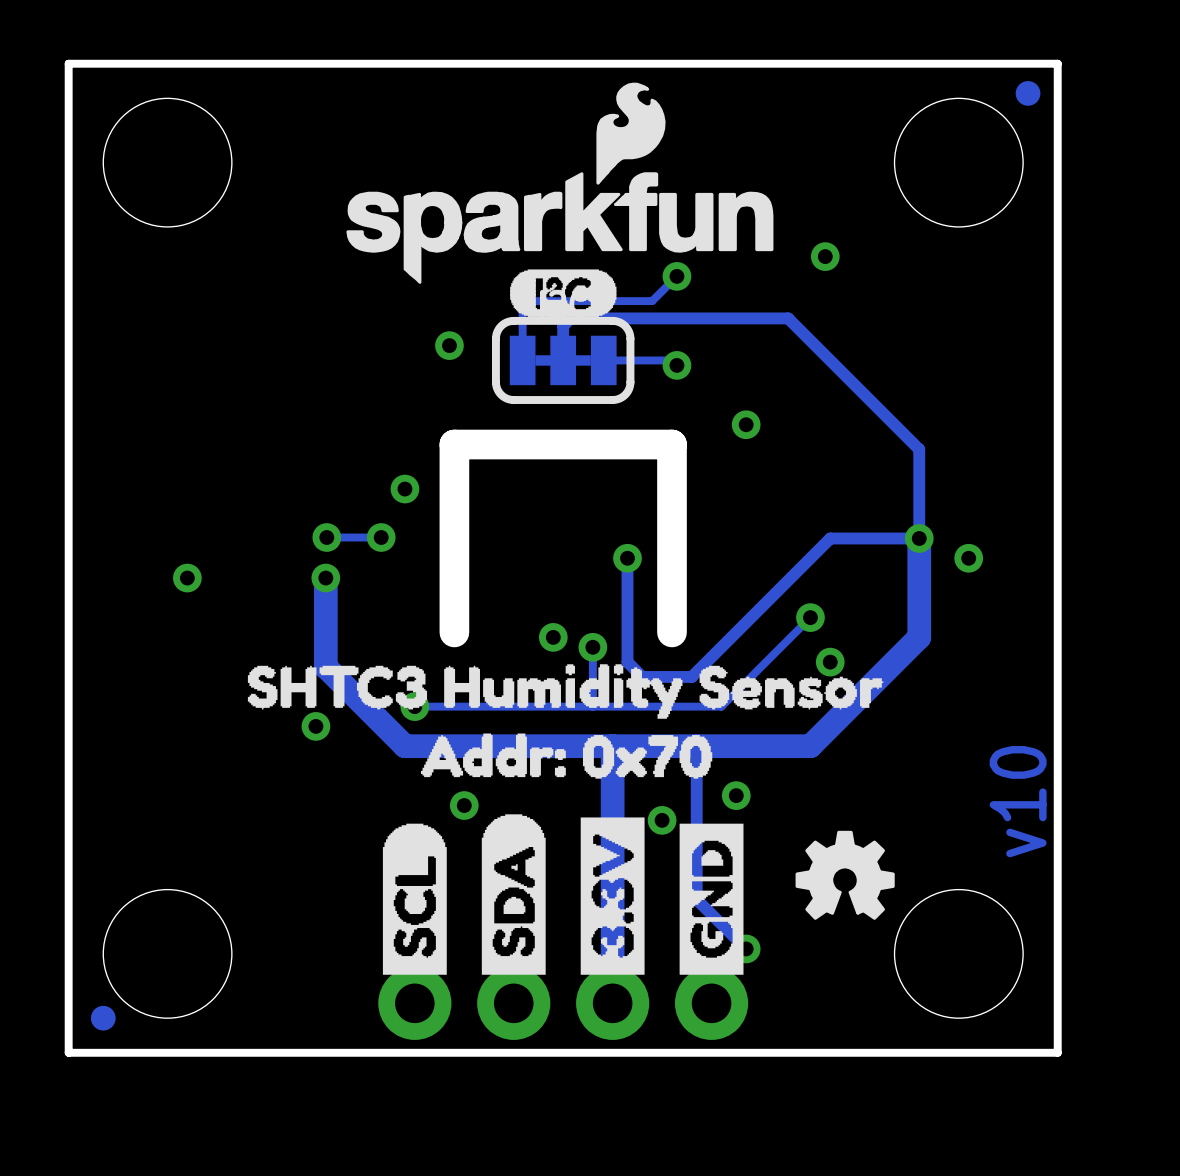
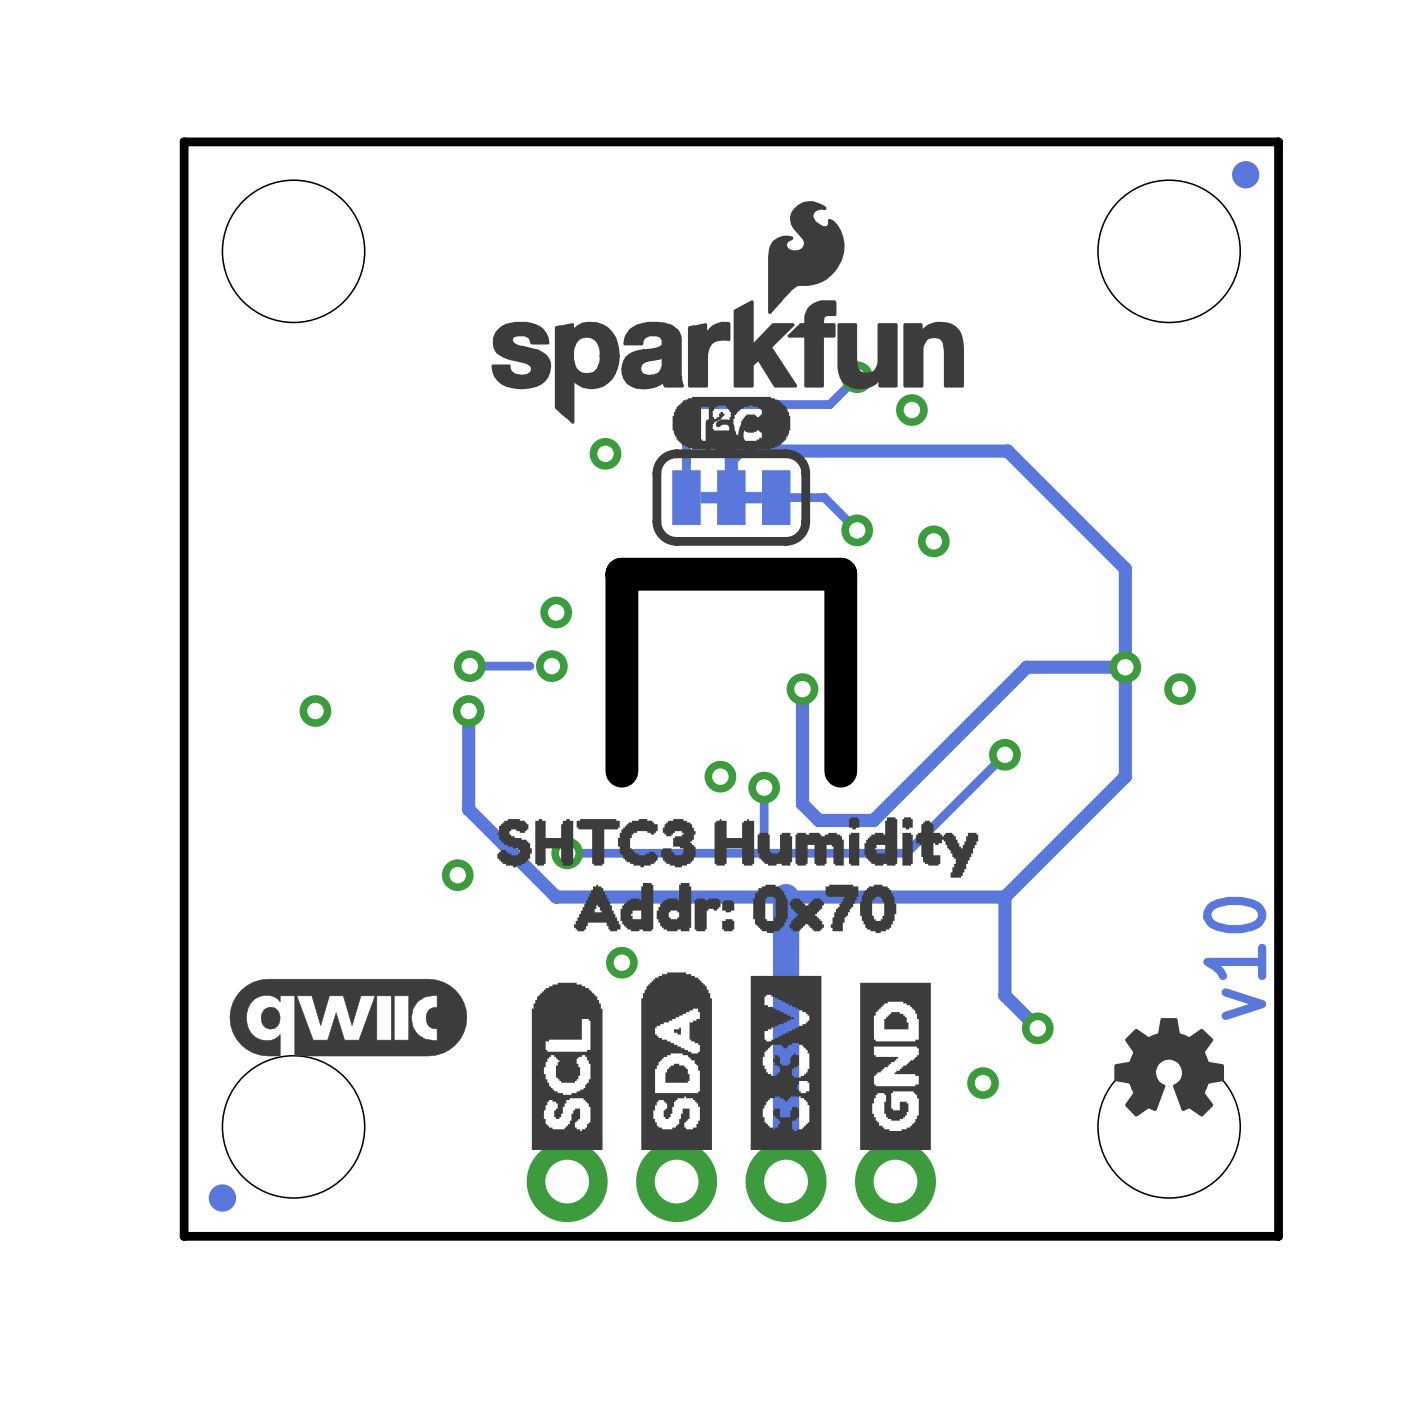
drawing position: (559, 183) -> (727, 312)
via: (825, 256) -> none
drawing position: (563, 293) -> (731, 423)
via: none -> (911, 410)
track: (812, 343) (788, 318) (570, 318) (563, 325) (563, 350) -> (1007, 451) (739, 451) (731, 459)
part position: (563, 360) -> (731, 497)
track: (603, 360) (671, 360) (676, 365) -> none
via: (676, 365) -> none
track: none -> (776, 497) (824, 497) (857, 530)
via: none -> (857, 530)
via position: (381, 537) -> (551, 666)
track width: thick (919, 538) (919, 637) (810, 746) (404, 746) (325, 667) (325, 578) -> thin (1125, 667) (1125, 776) (1004, 897) (556, 897) (468, 809) (468, 711)
board edge: none -> (840, 771) (840, 574) (621, 574) (621, 771)
board edge: (671, 632) (671, 444) (454, 444) (454, 632) -> none
via: (830, 662) -> none
drawing shape: [247, 664, 884, 719] -> [497, 817, 979, 878]
track: (696, 746) (696, 899) (746, 948) -> none
track: none -> (1004, 897) (1004, 995) (1037, 1028)
via: (736, 795) -> none
drawing: none -> [229, 978, 468, 1057]
via: (662, 820) -> none
via: none -> (1037, 1028)
drawing position: (845, 875) -> (1169, 1067)
via position: (746, 948) -> (983, 1083)

